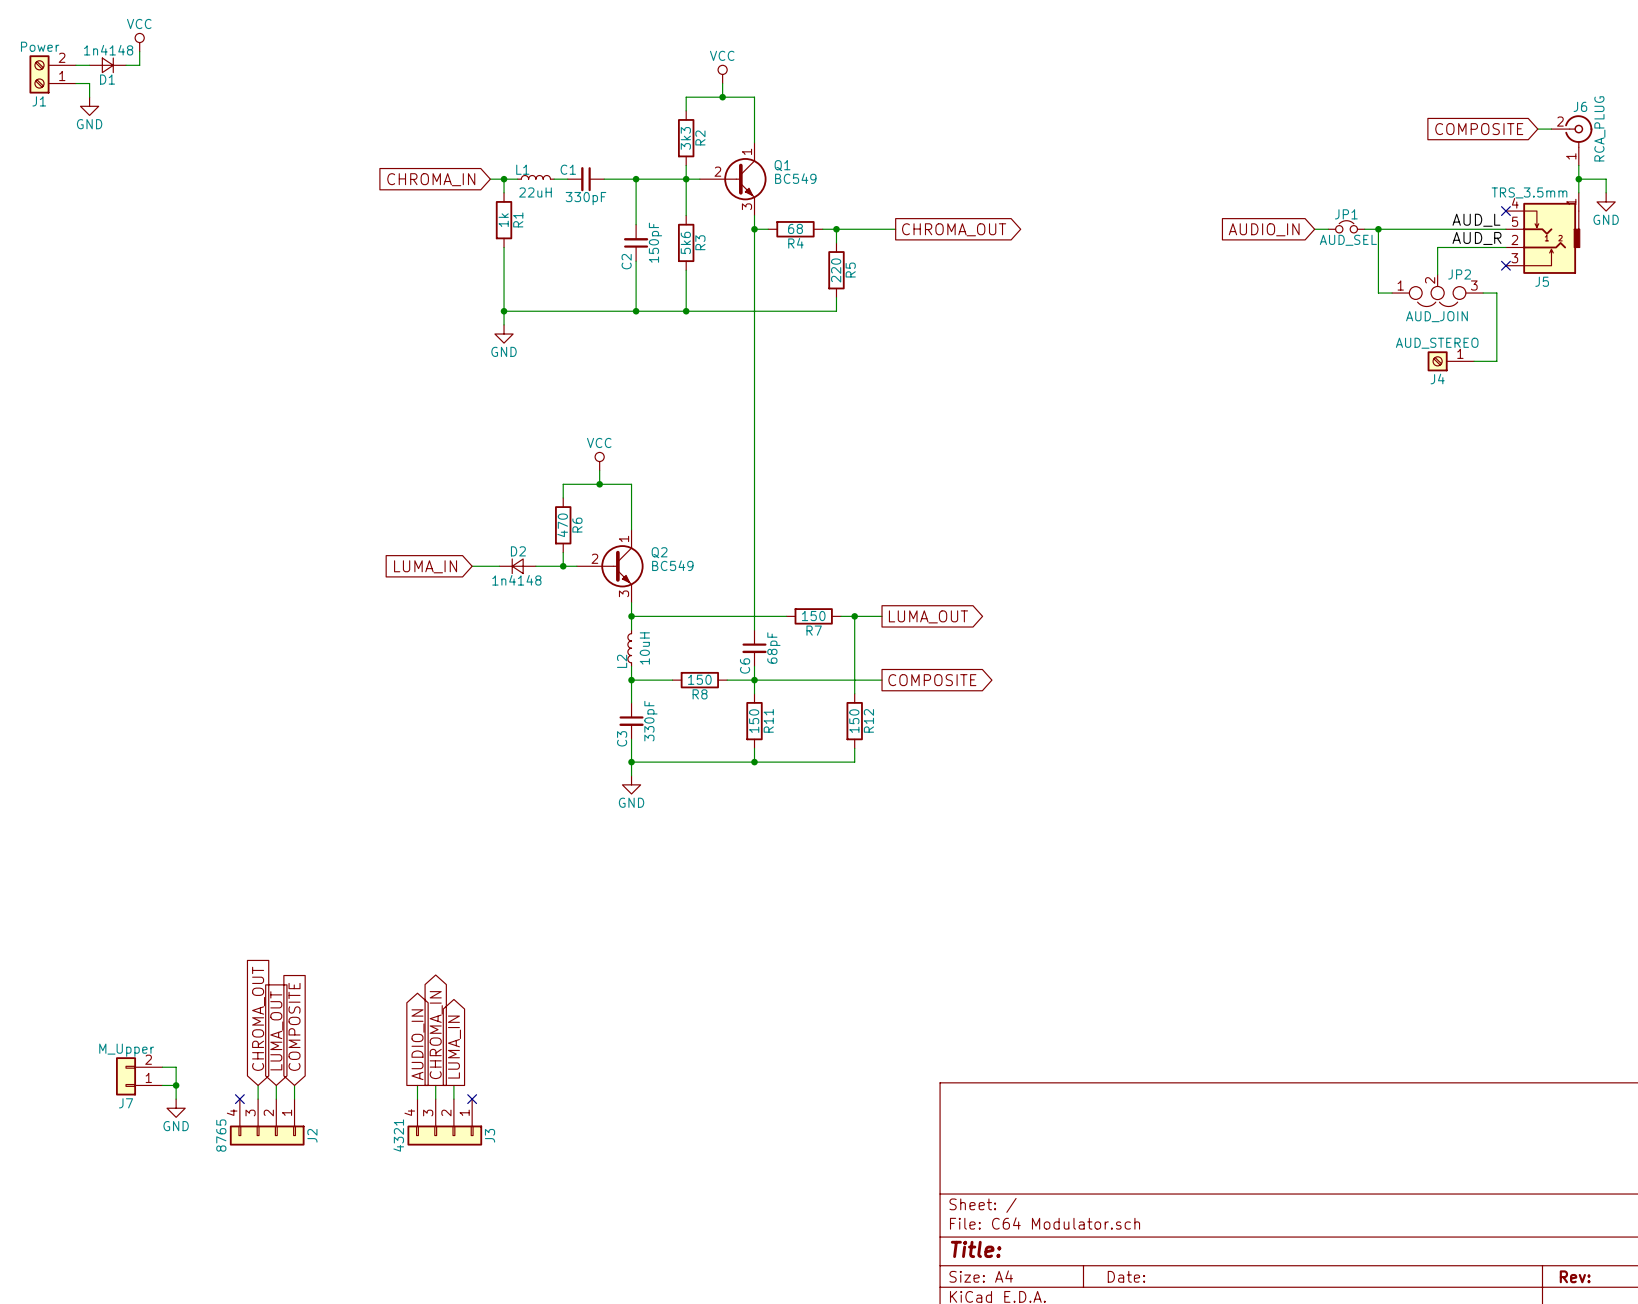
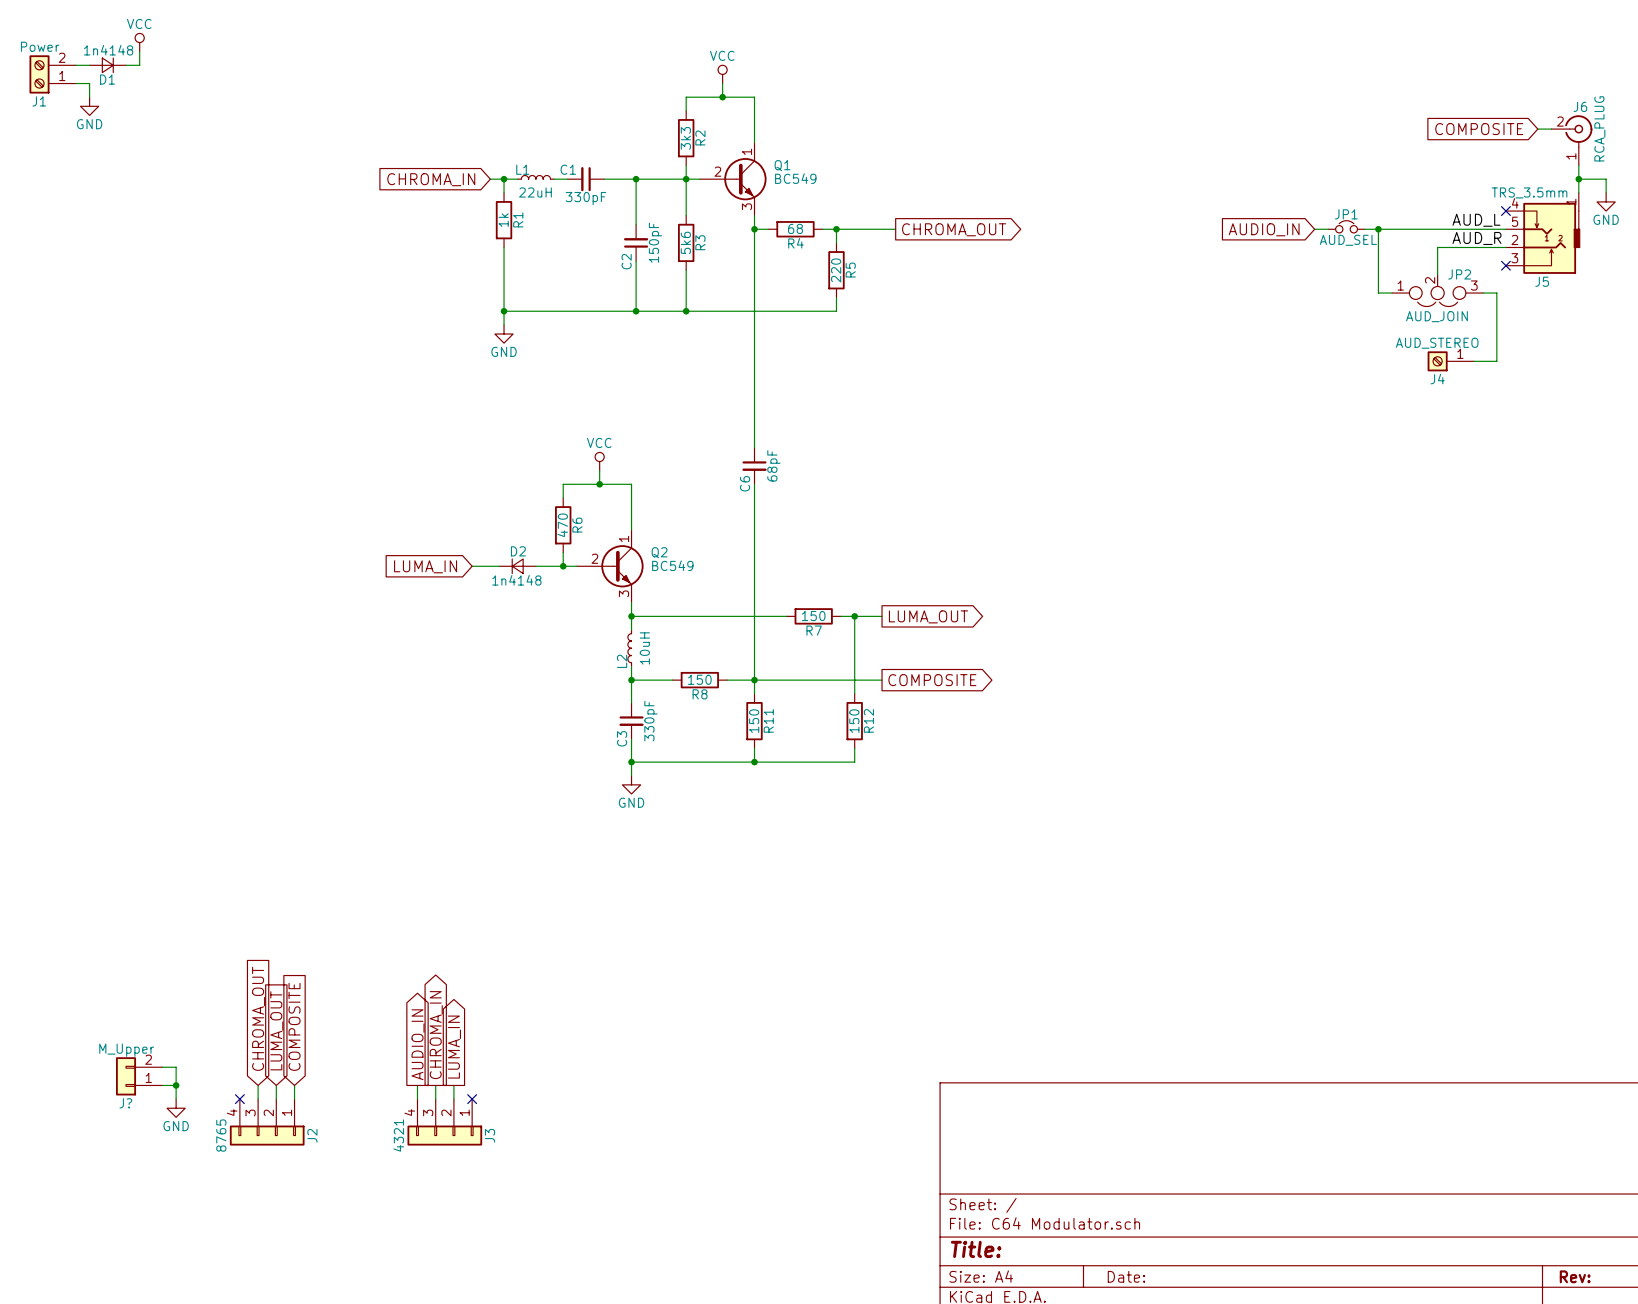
C6 position: (754, 648) -> (754, 466)
J7 name: J7 (126, 1103) -> J? (125, 1103)

